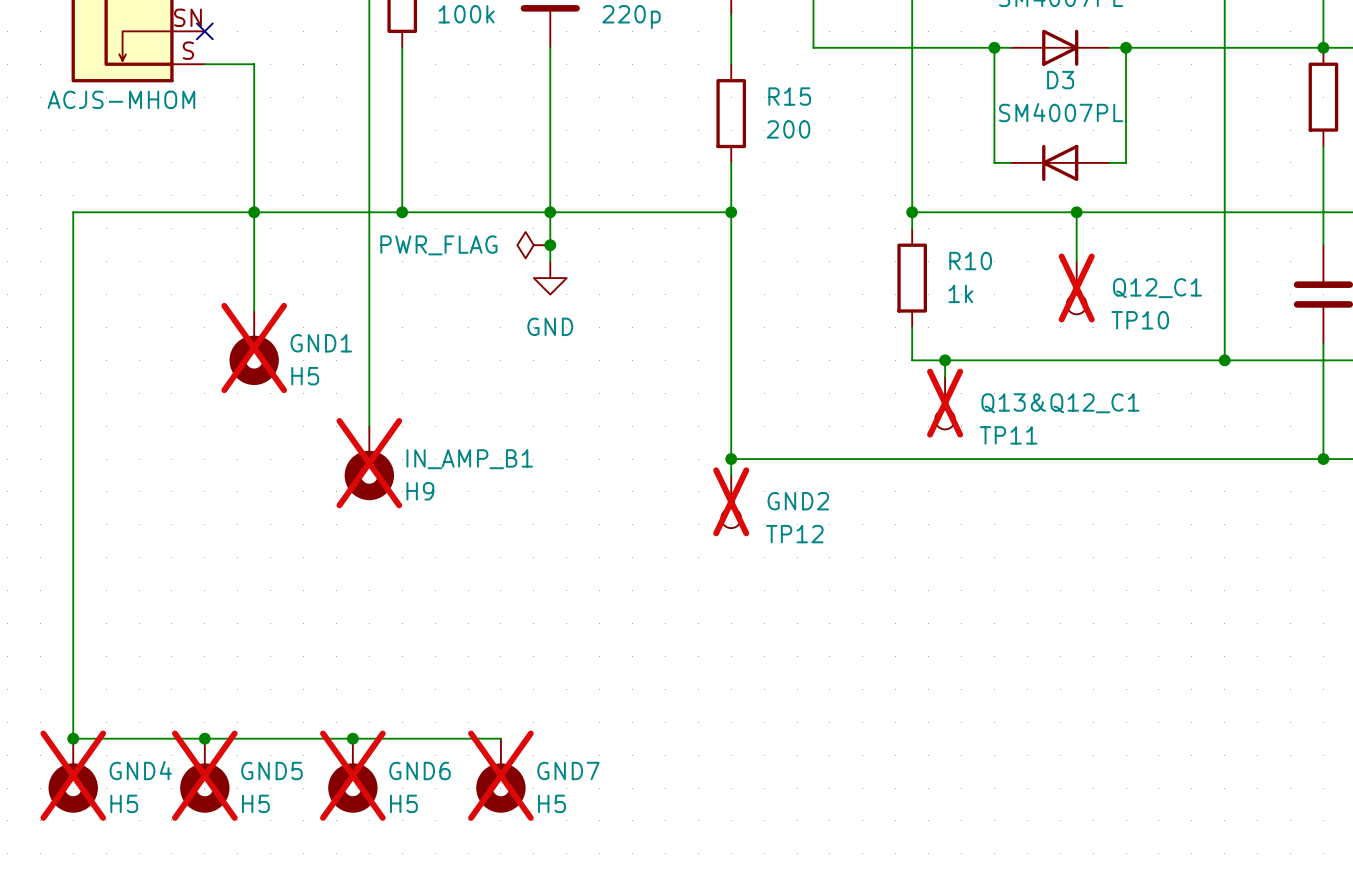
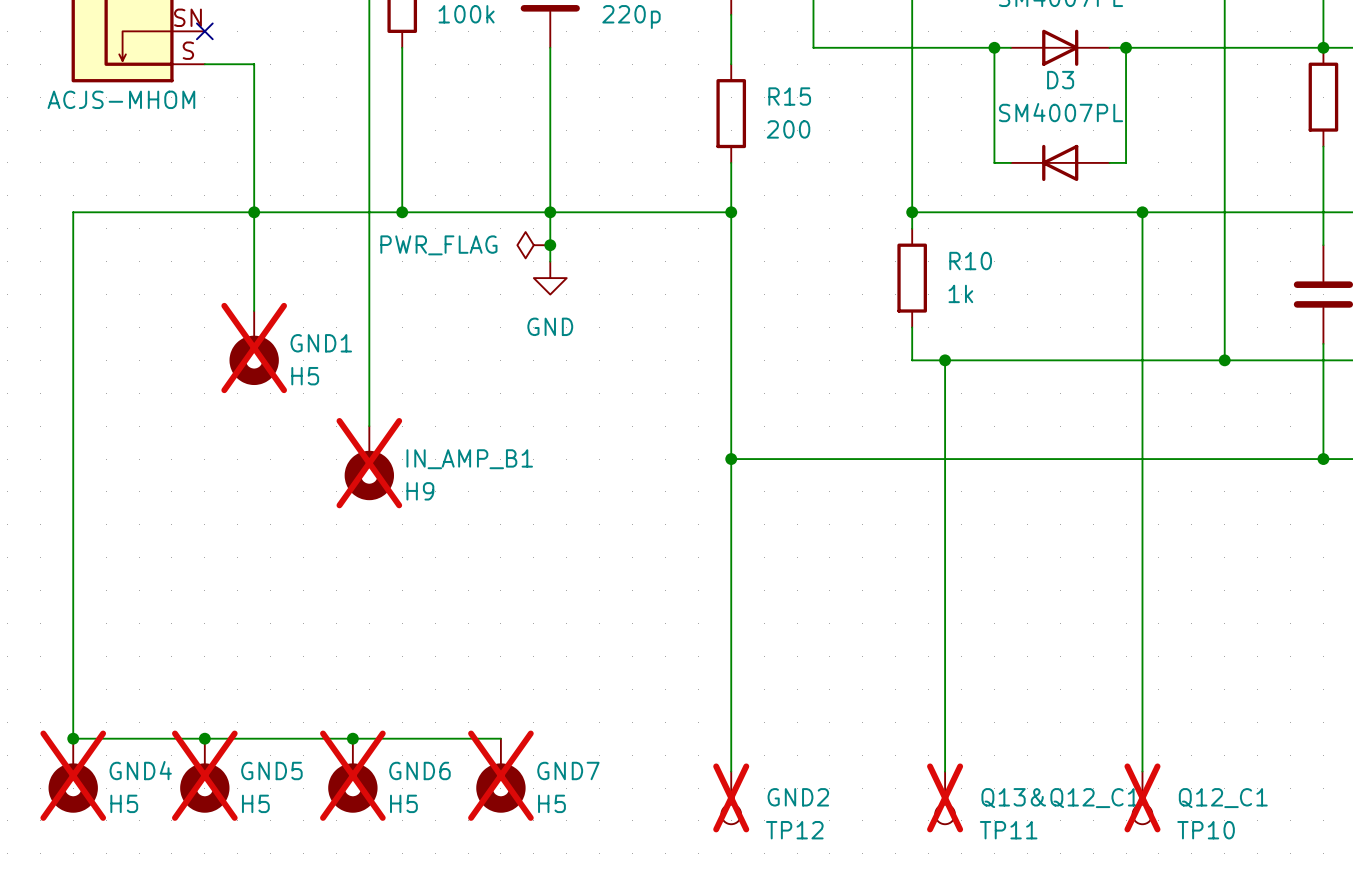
wire: (1076, 212) (1076, 261) -> none
junction position: (1076, 212) -> (1142, 212)
wire: none -> (1142, 212) (1142, 771)
Q12_C1 position: (1076, 287) -> (1142, 797)
wire: none -> (945, 376) (945, 771)
Q13&Q12_C1 position: (945, 403) -> (945, 797)
wire: none -> (731, 475) (731, 771)
GND2 position: (731, 501) -> (731, 797)

